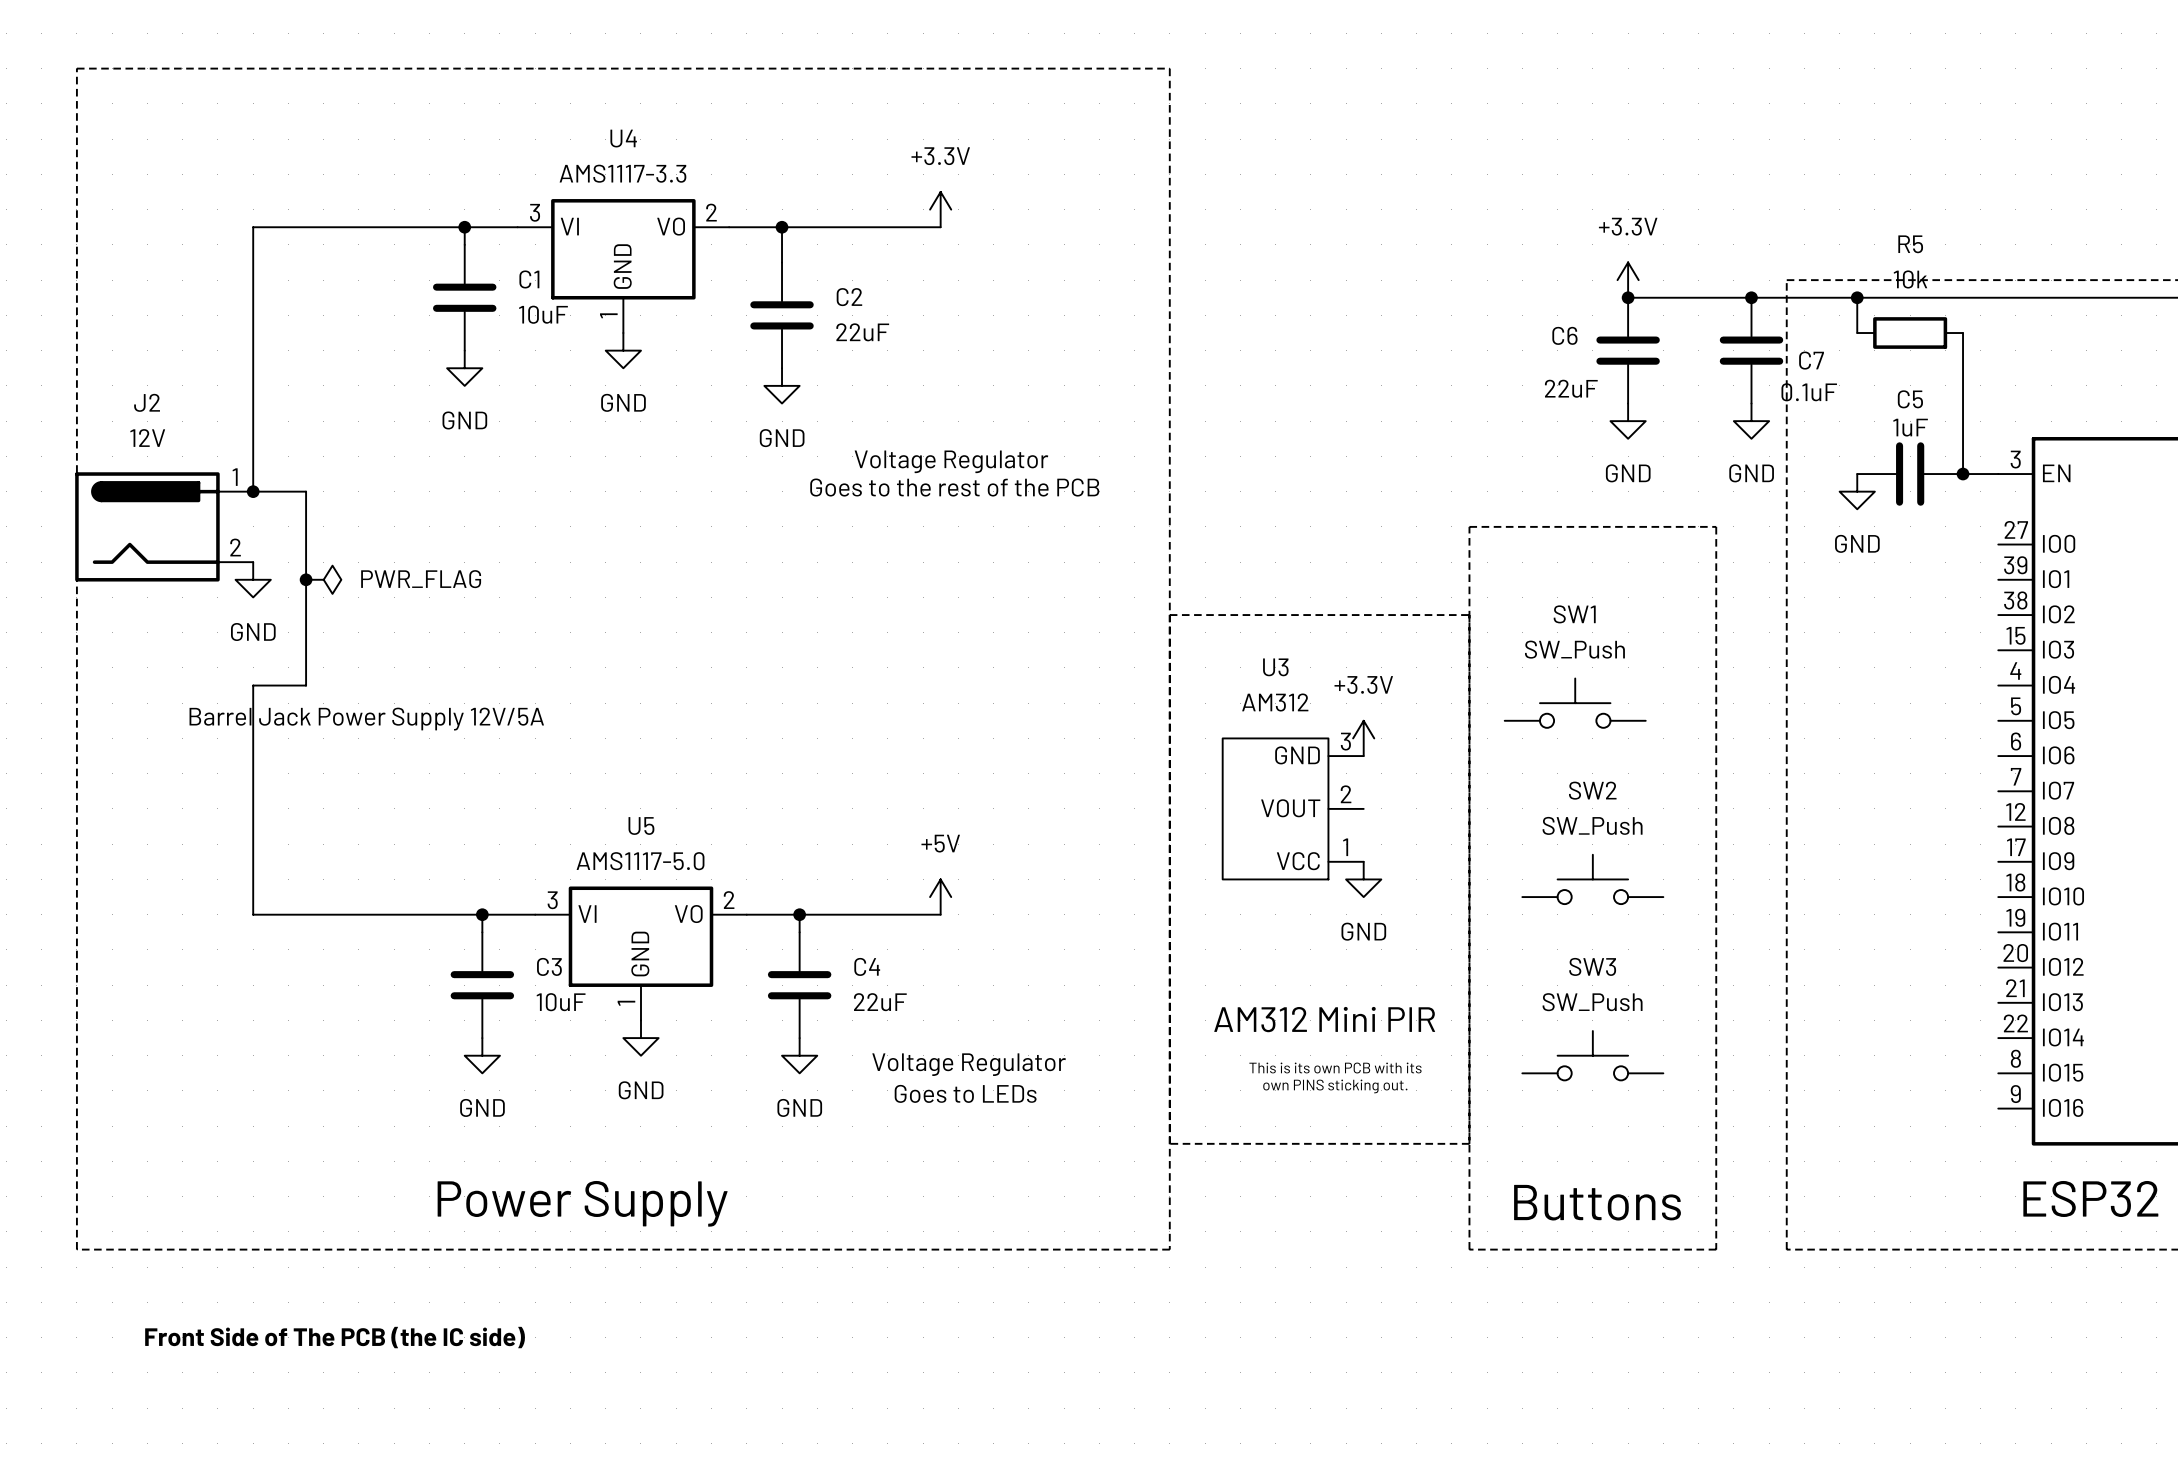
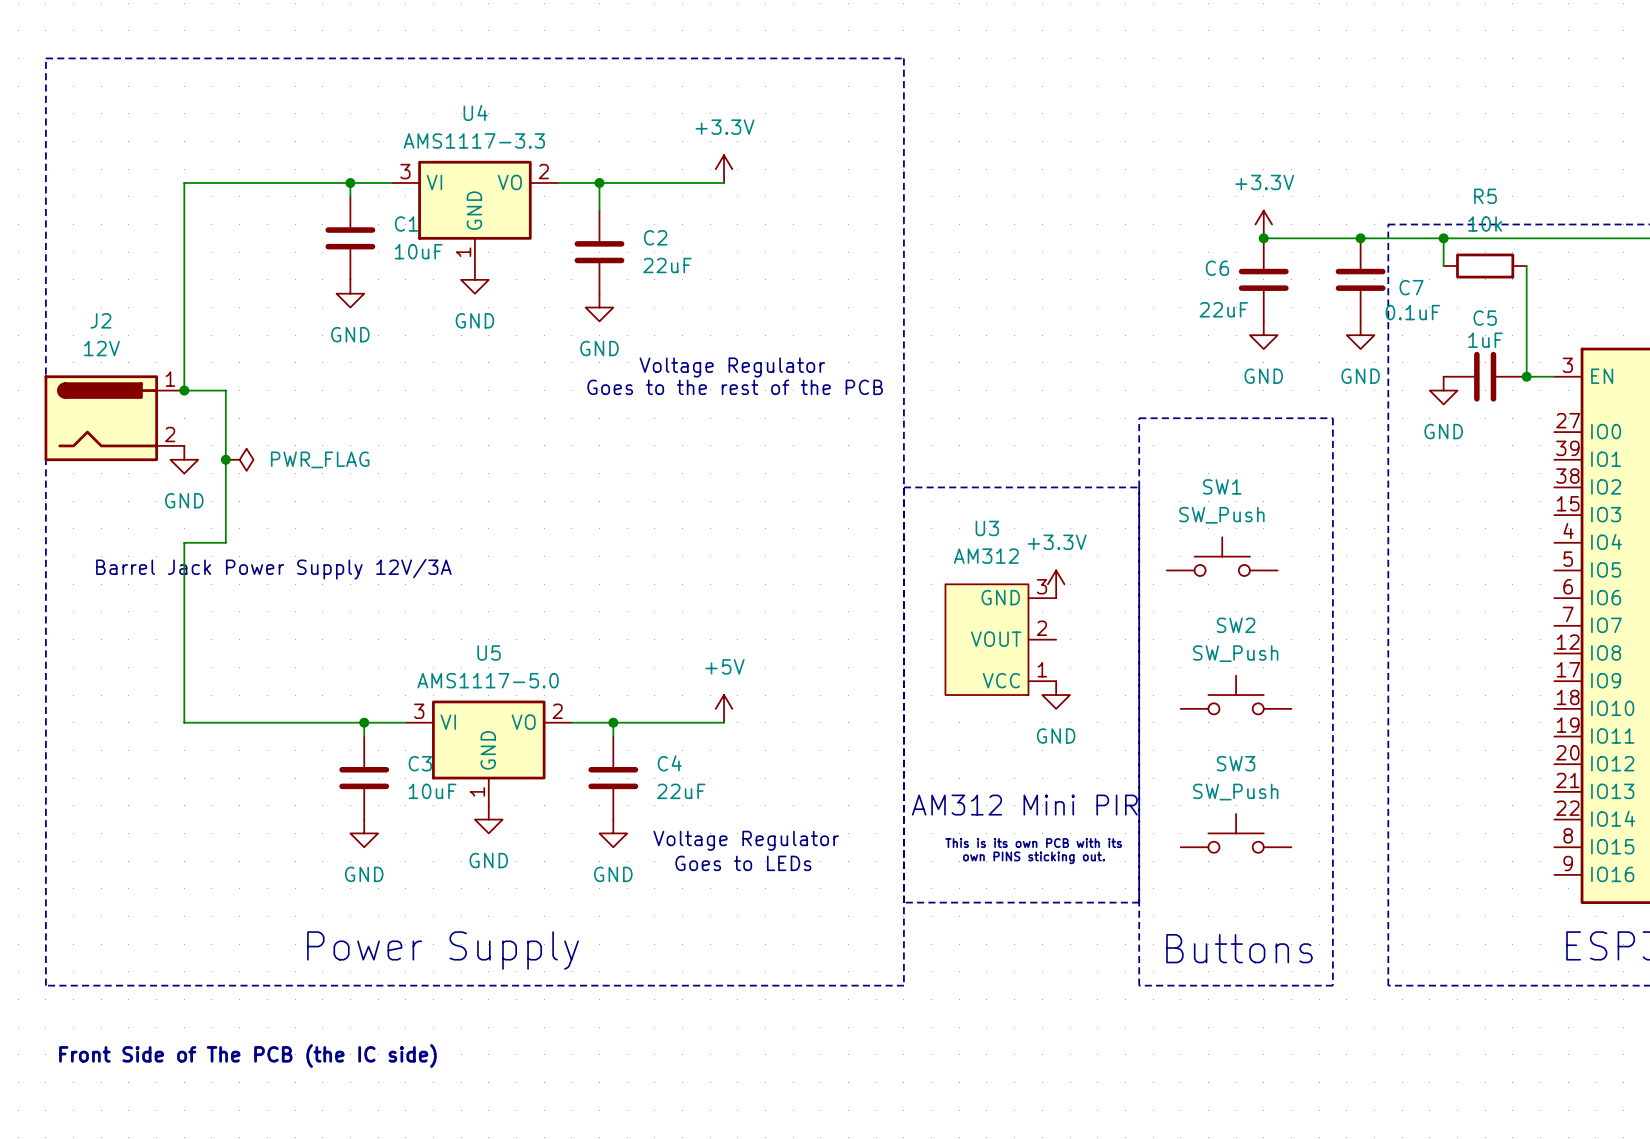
text: Barrel Jack Power Supply 12V/5A (366, 719) -> Barrel Jack Power Supply 12V/3A (273, 569)

